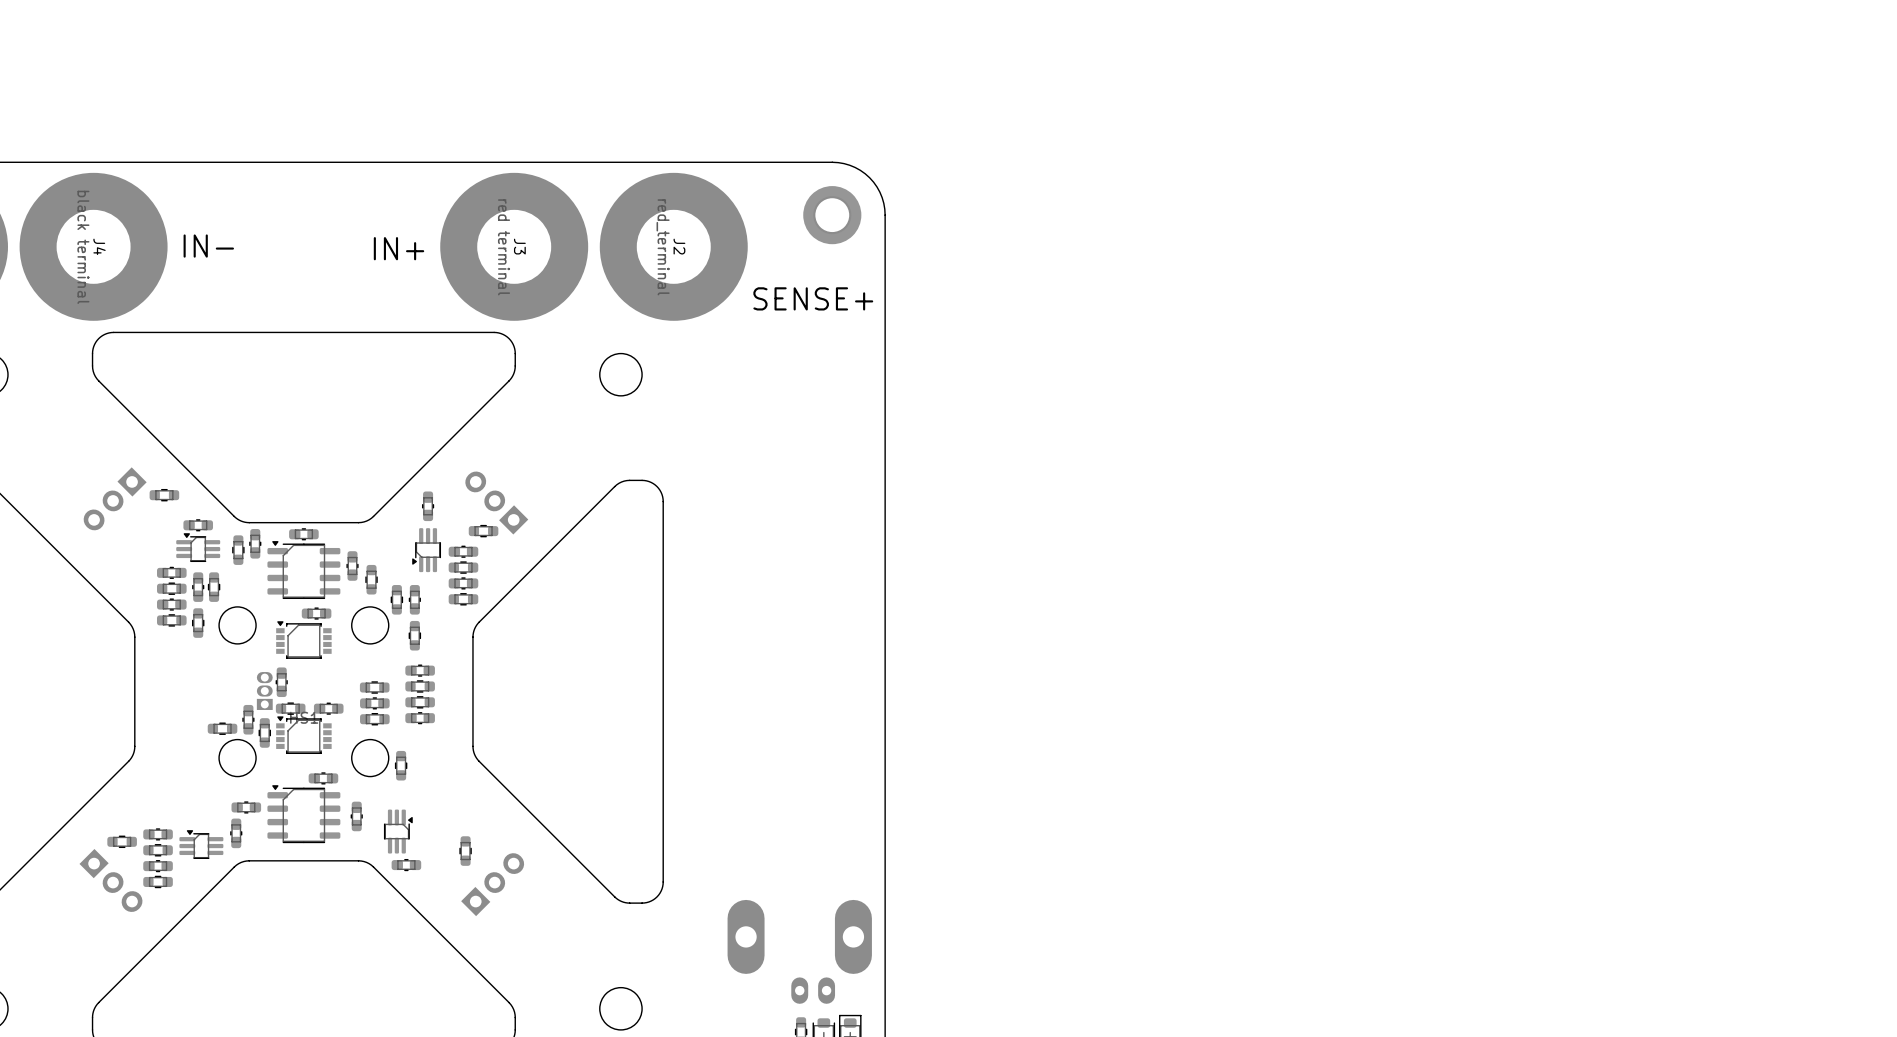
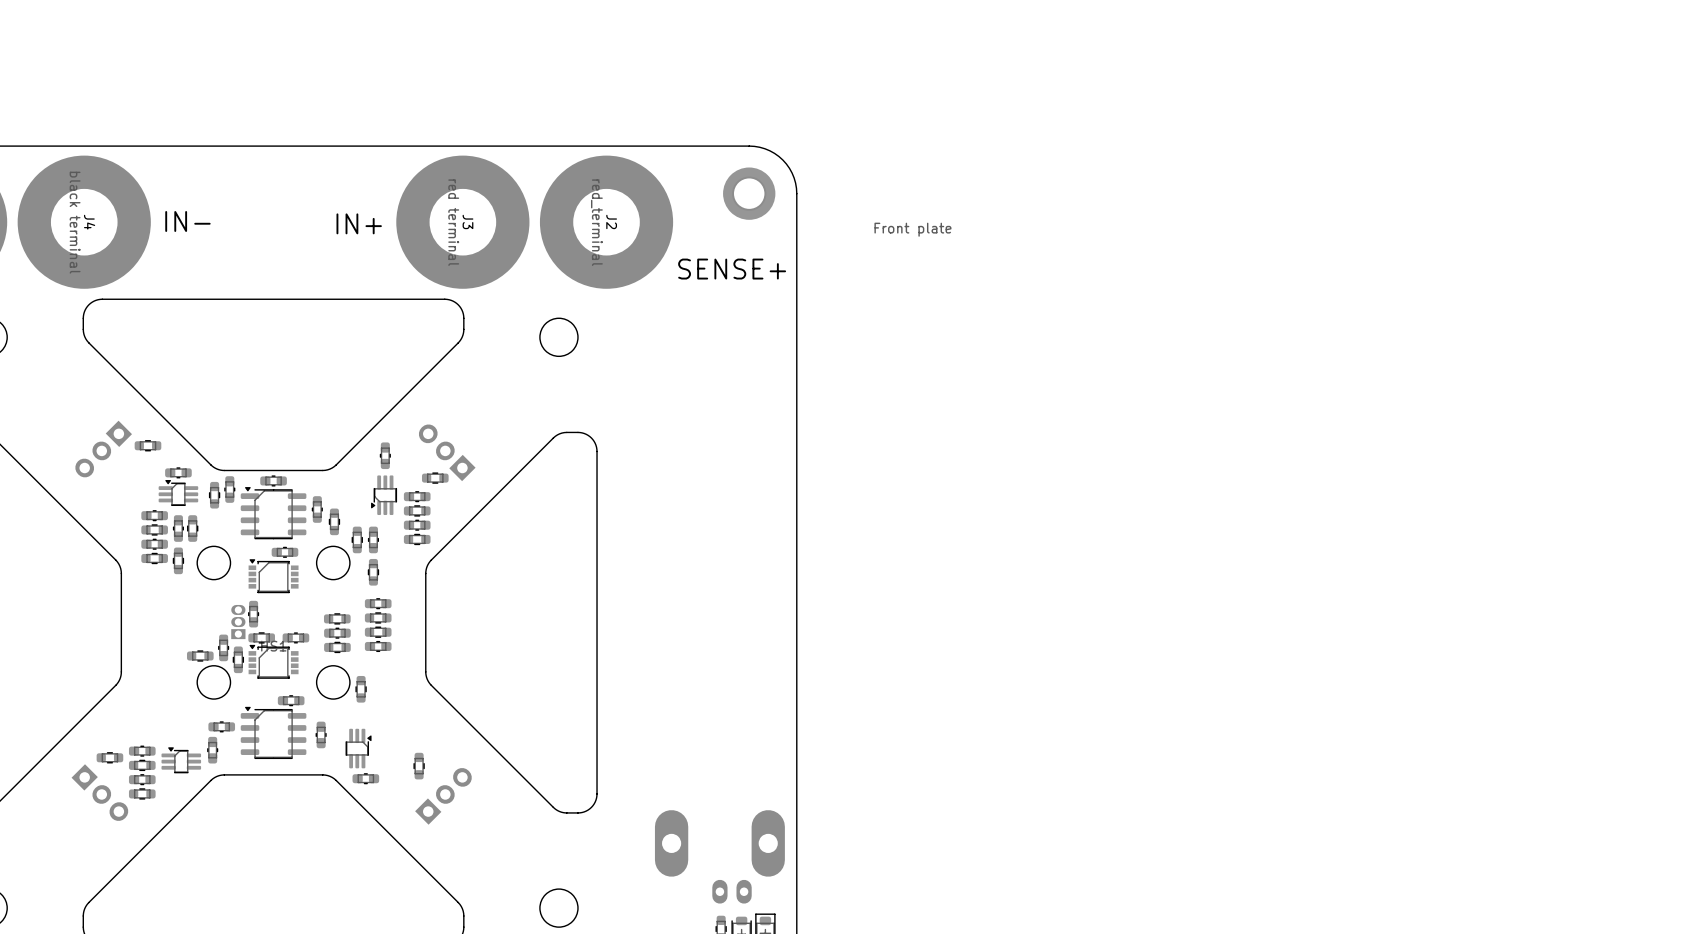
drawing: none -> [874, 222, 952, 237]

